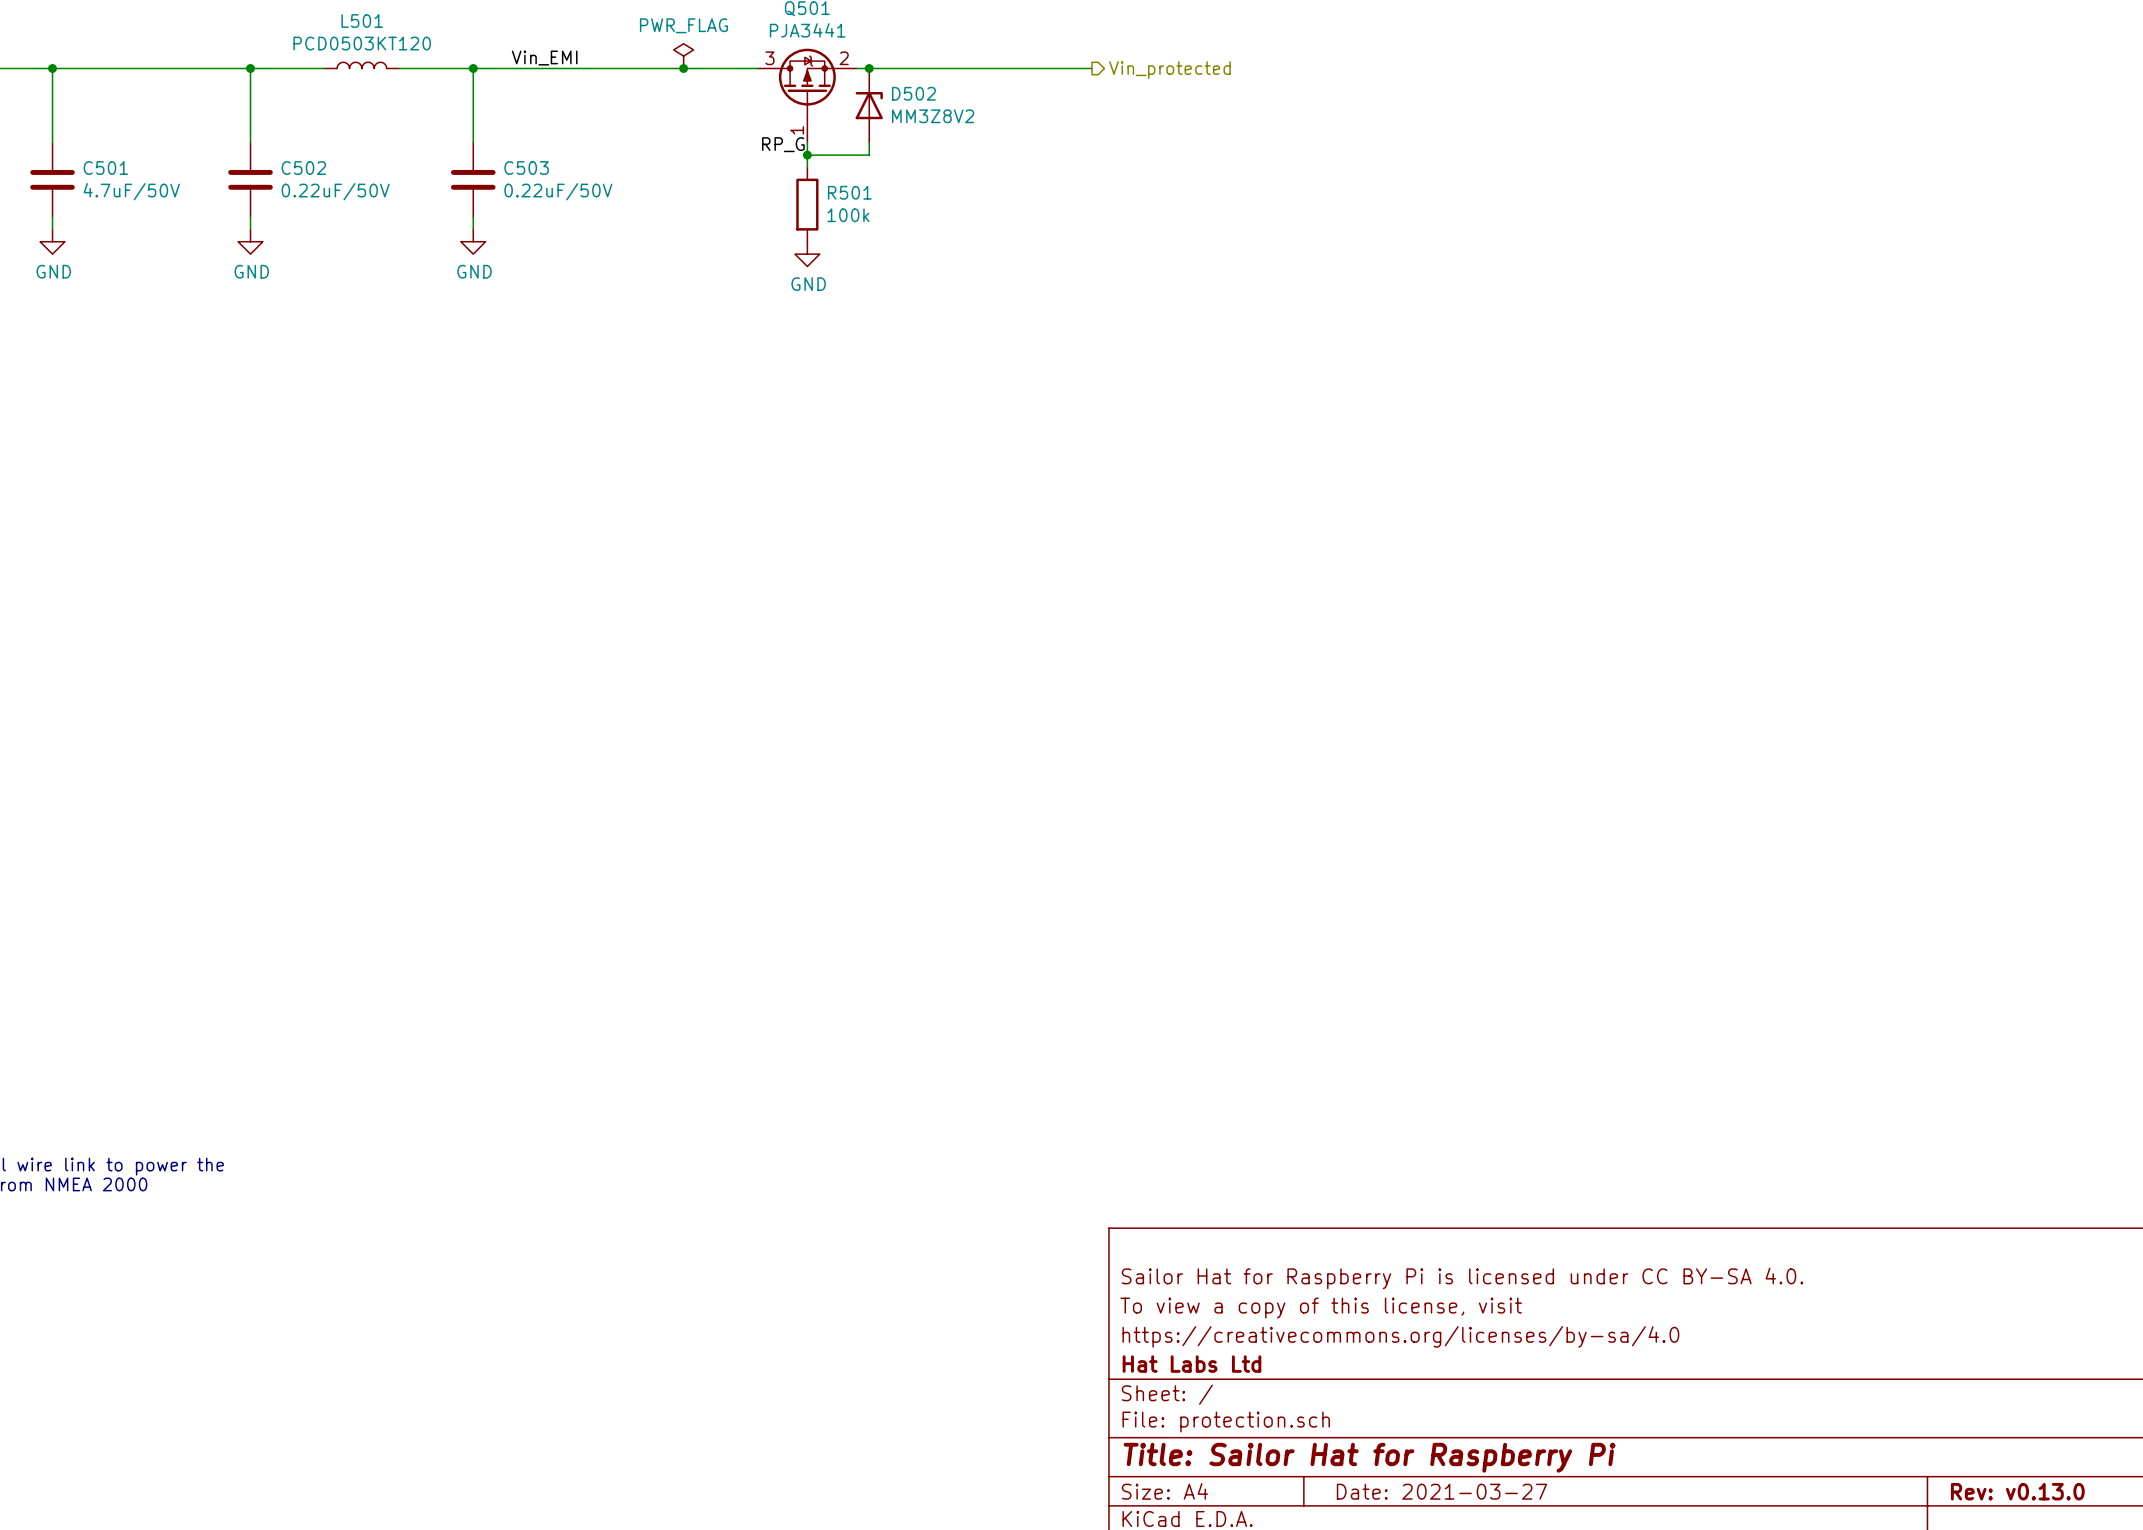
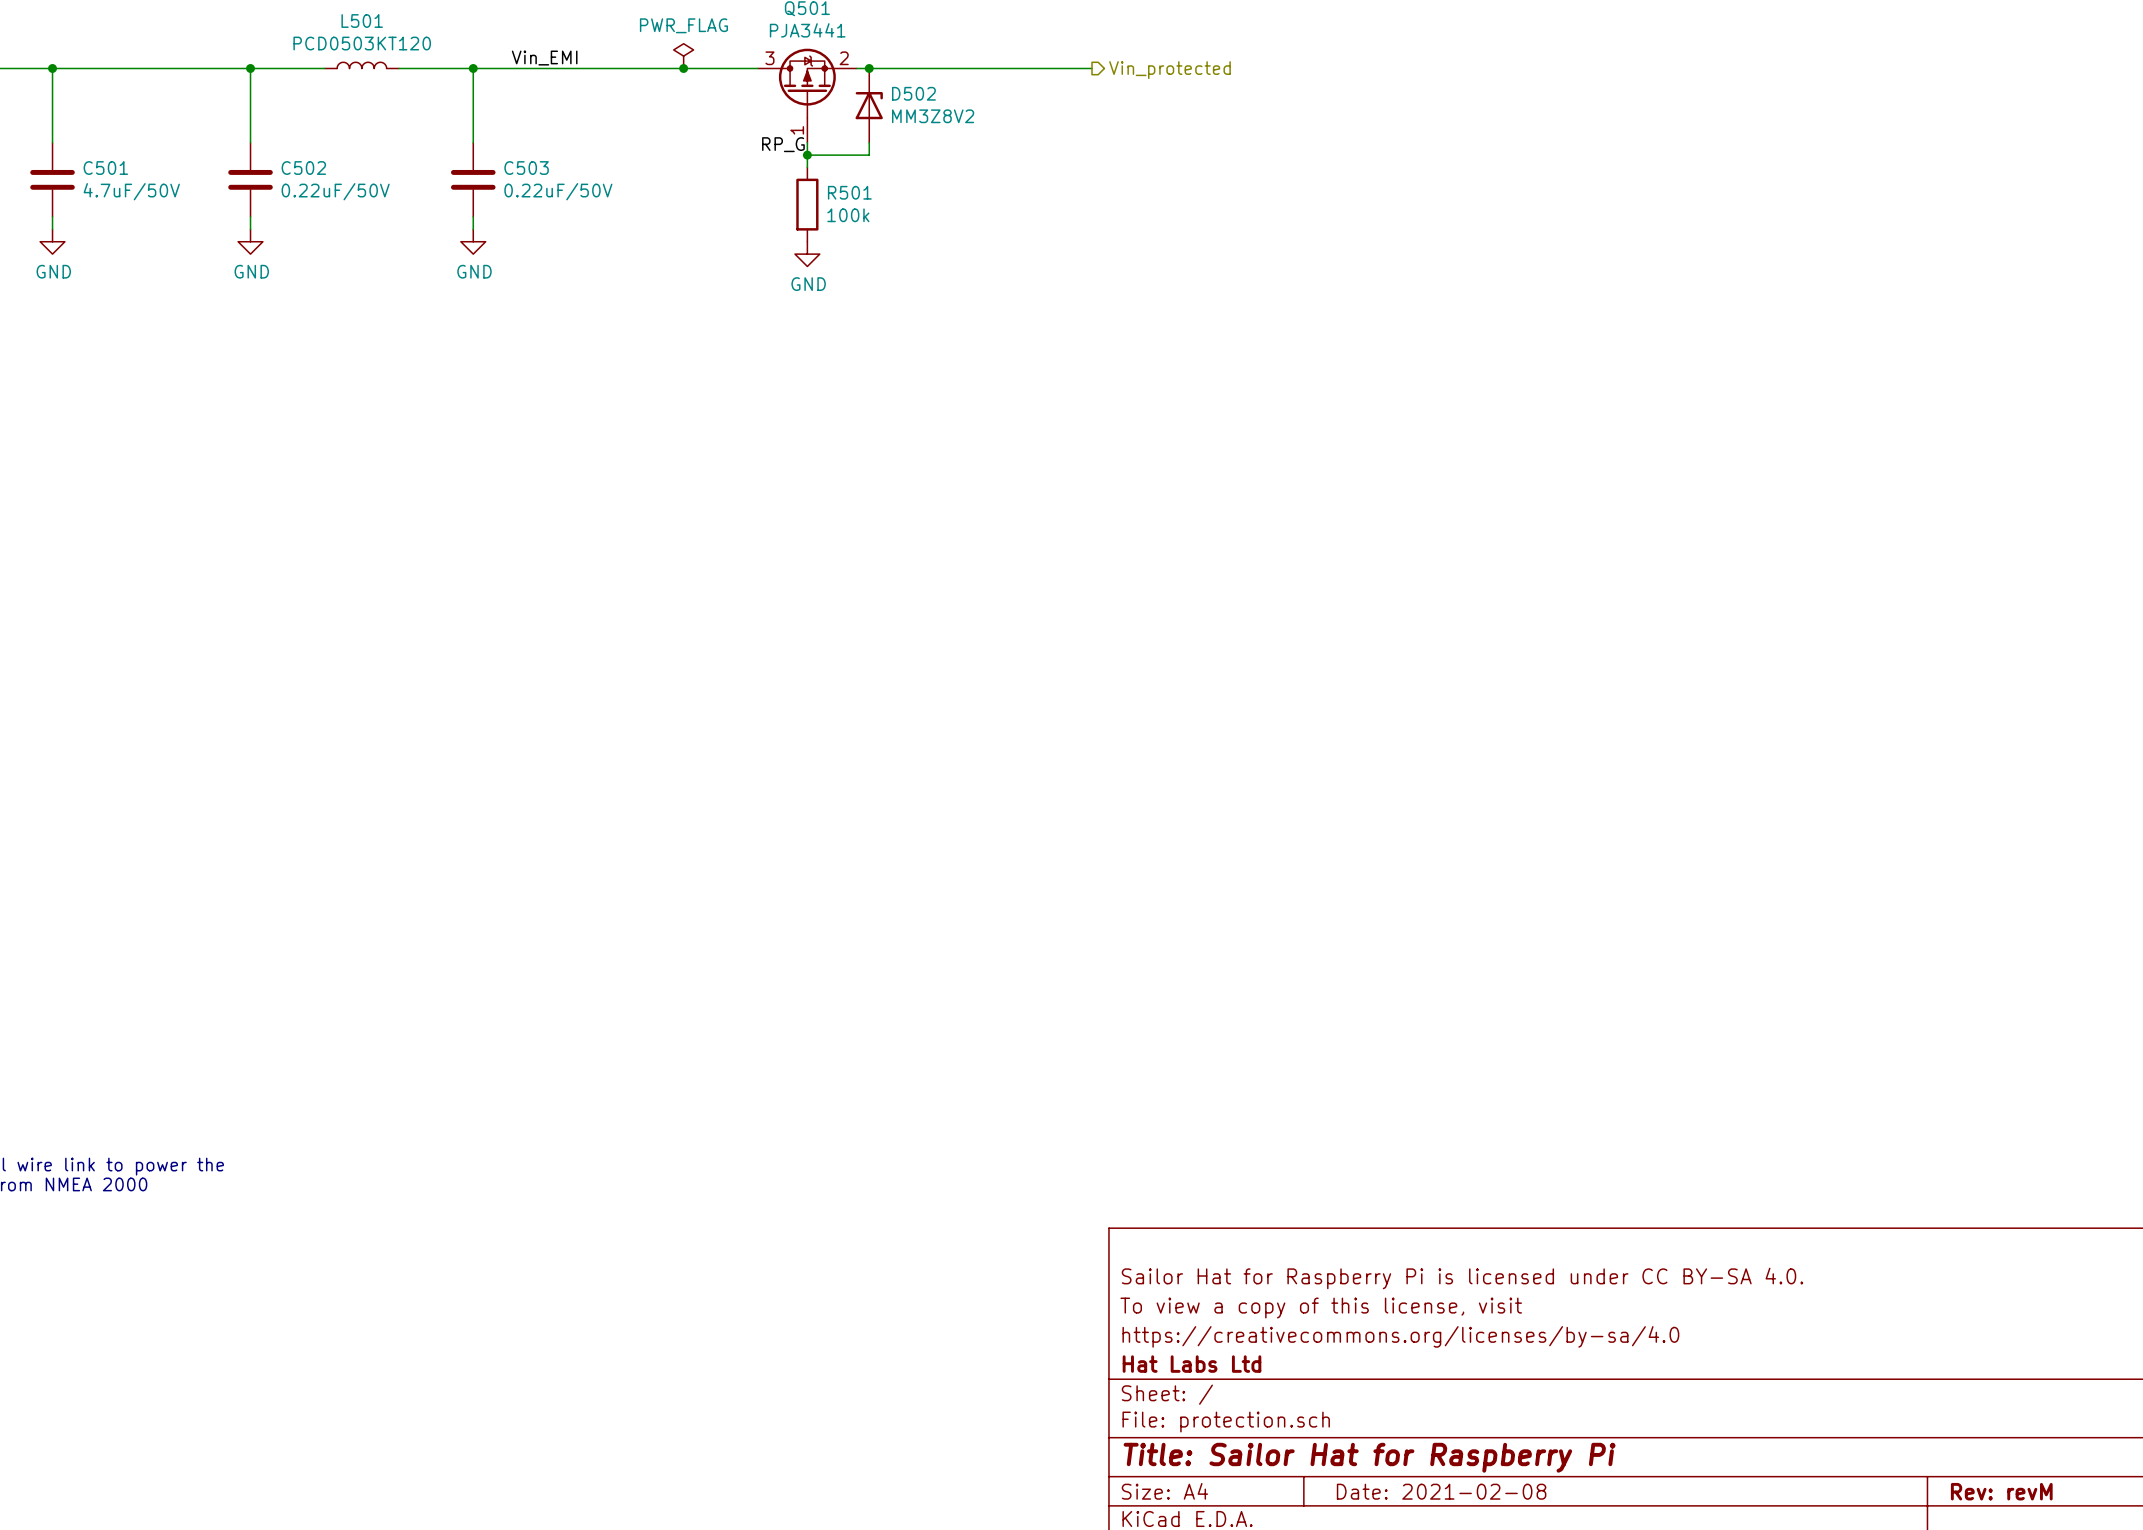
title block: Date: 2021-03-27 (1441, 1491) -> Date: 2021-02-08 (1441, 1491)
title block: Rev: v0.13.0 (2017, 1491) -> Rev: revM (2001, 1491)

